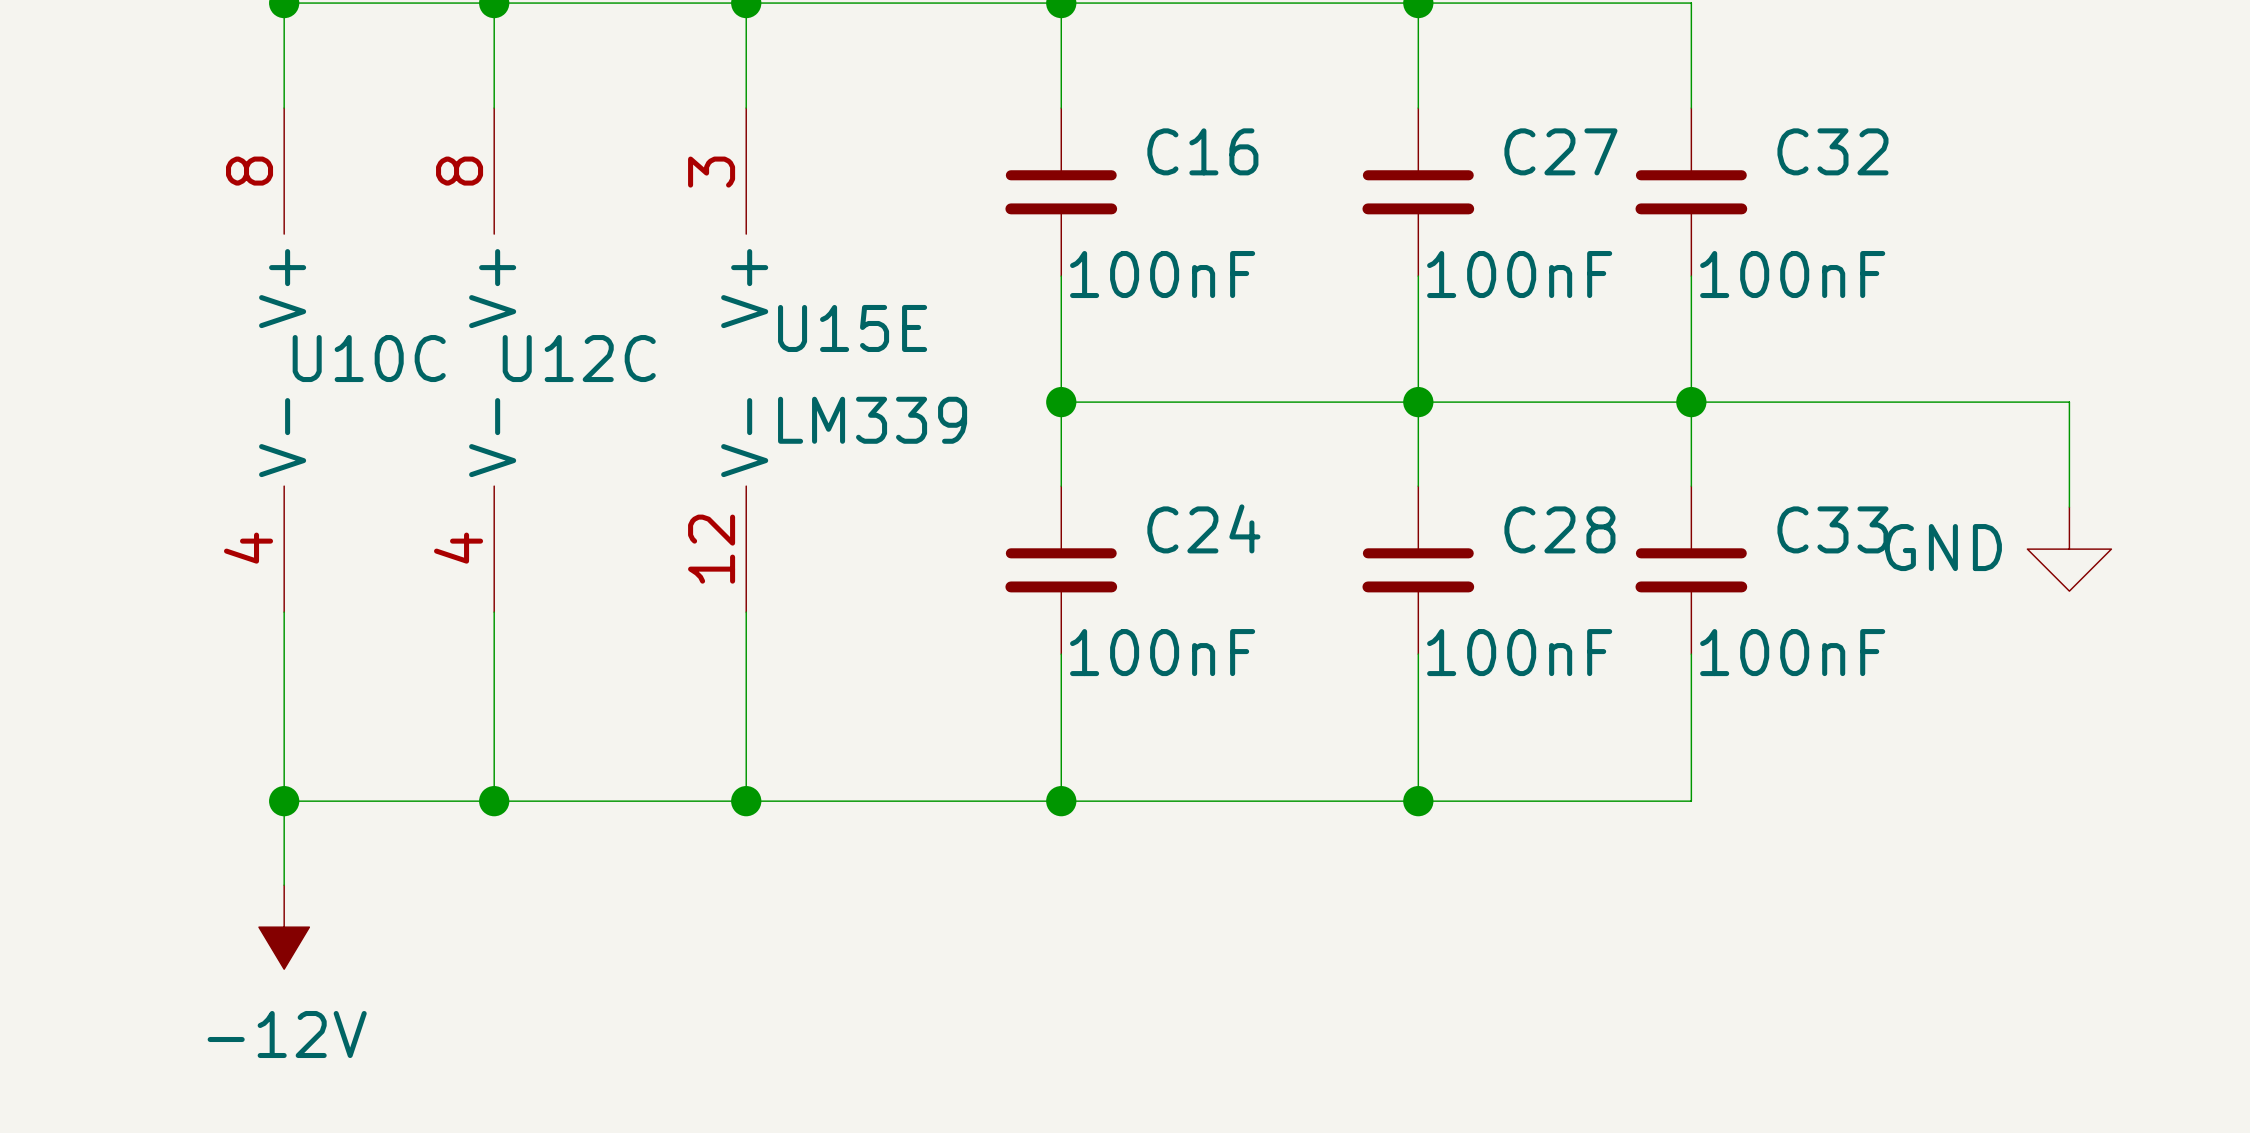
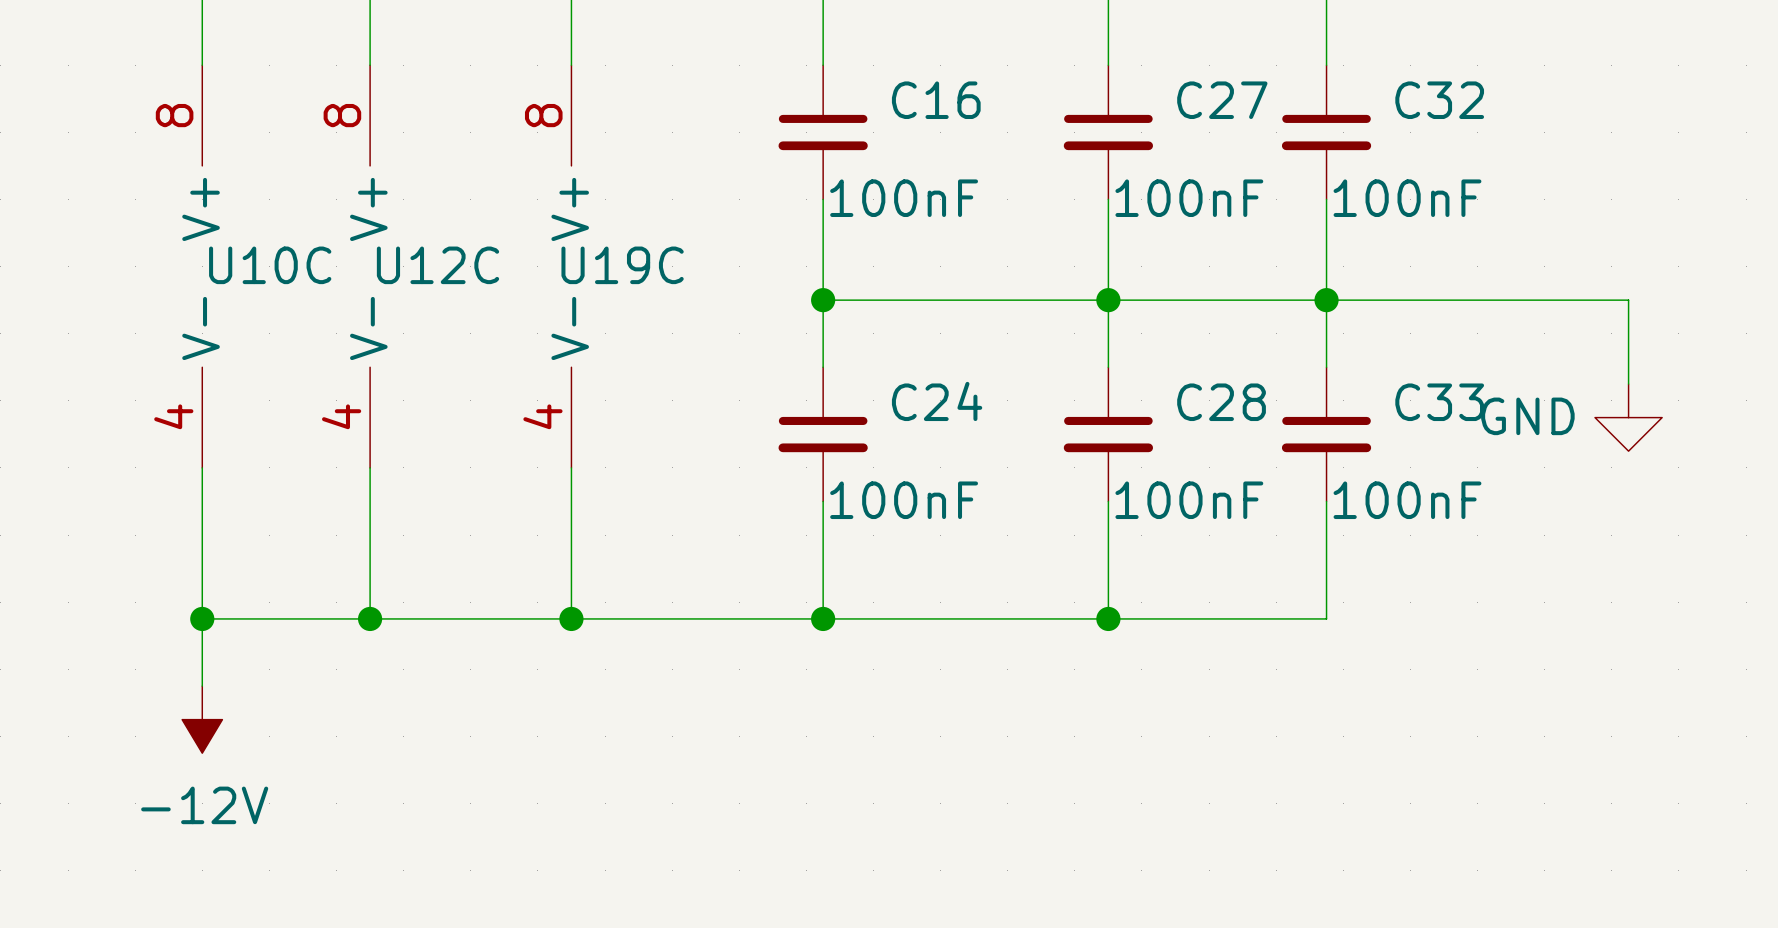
U15E pin number: 3 (711, 172) -> 8 (543, 115)
U15E name: U15E (852, 328) -> U19C (622, 265)
U15E value: LM339 (872, 420) -> none
U15E pin number: 12 (711, 549) -> 4 (542, 416)

